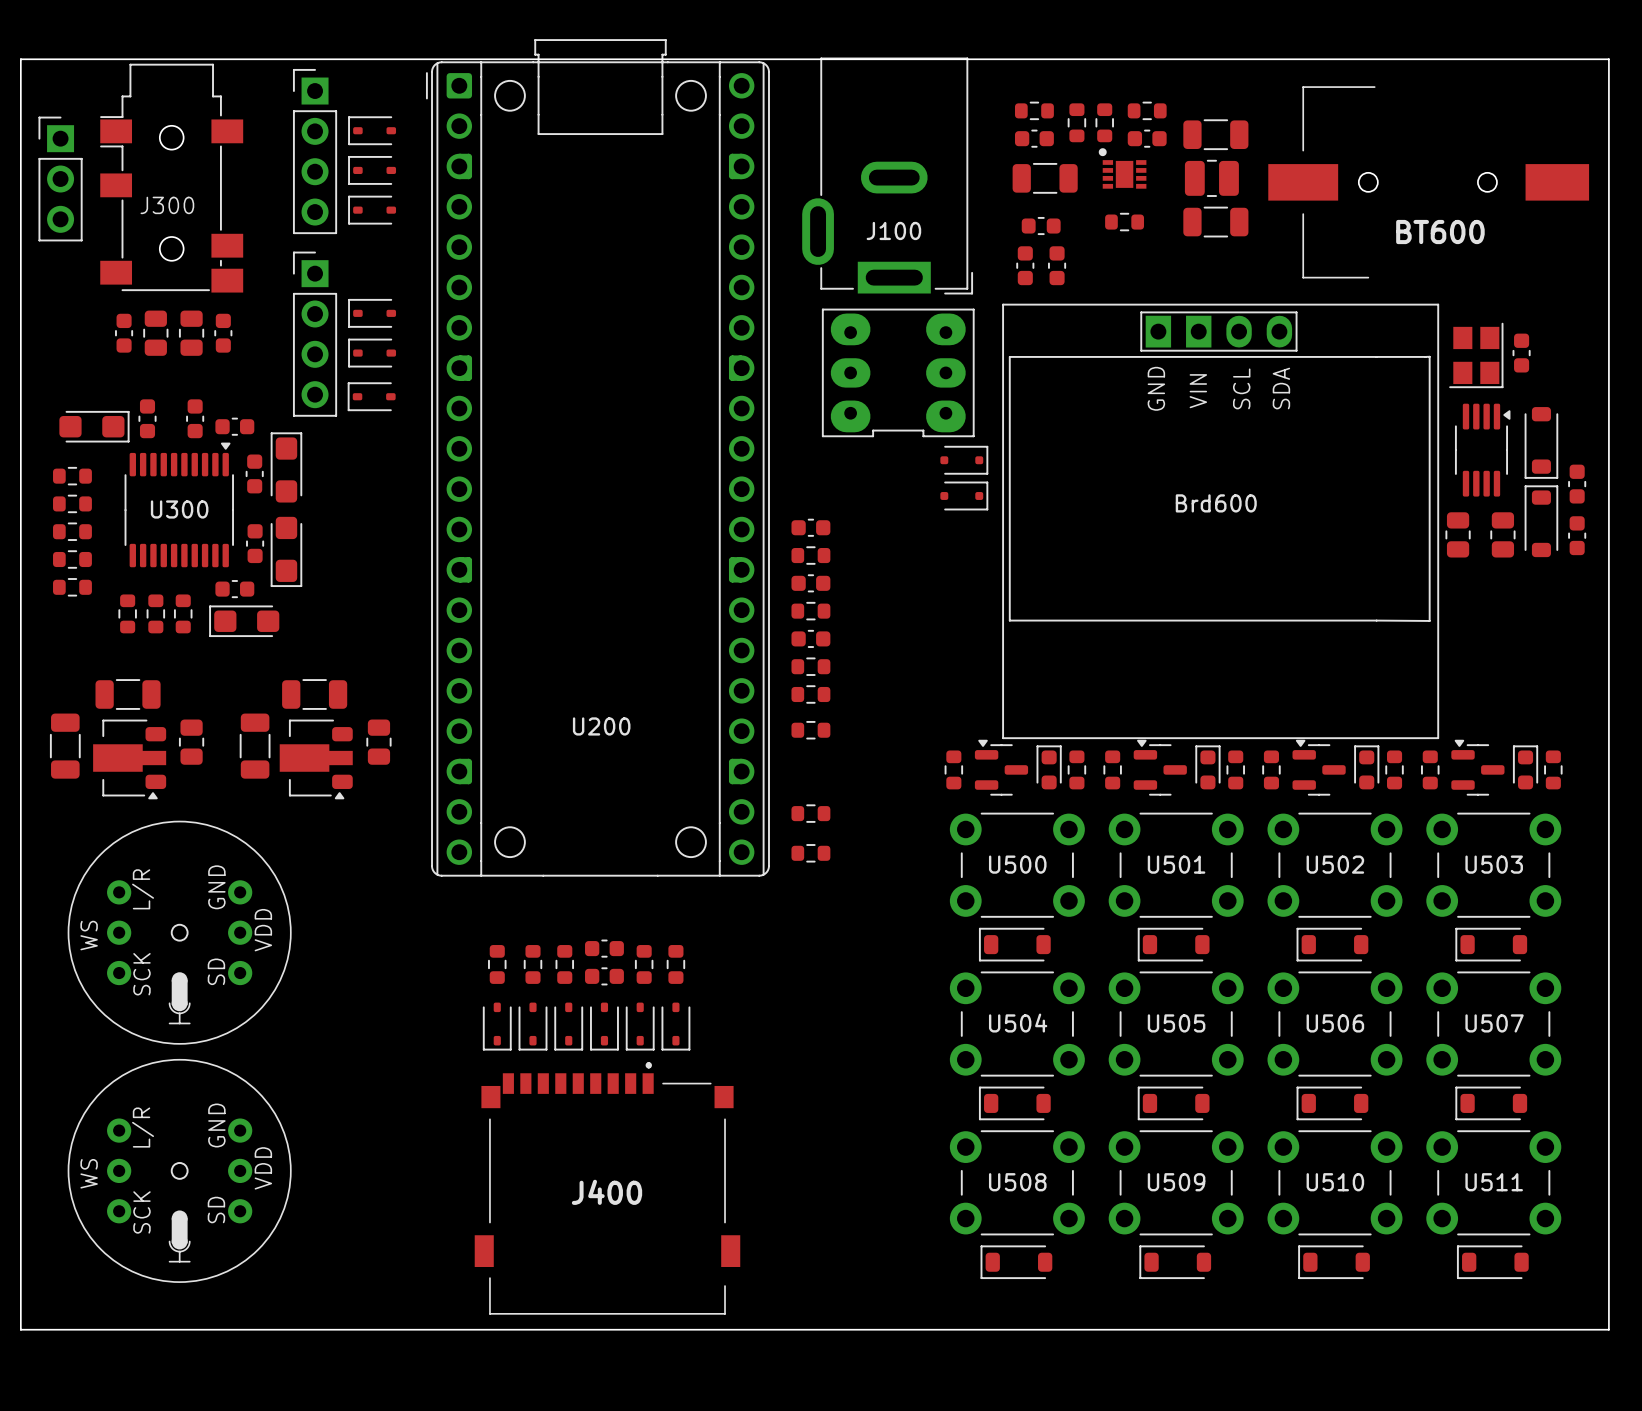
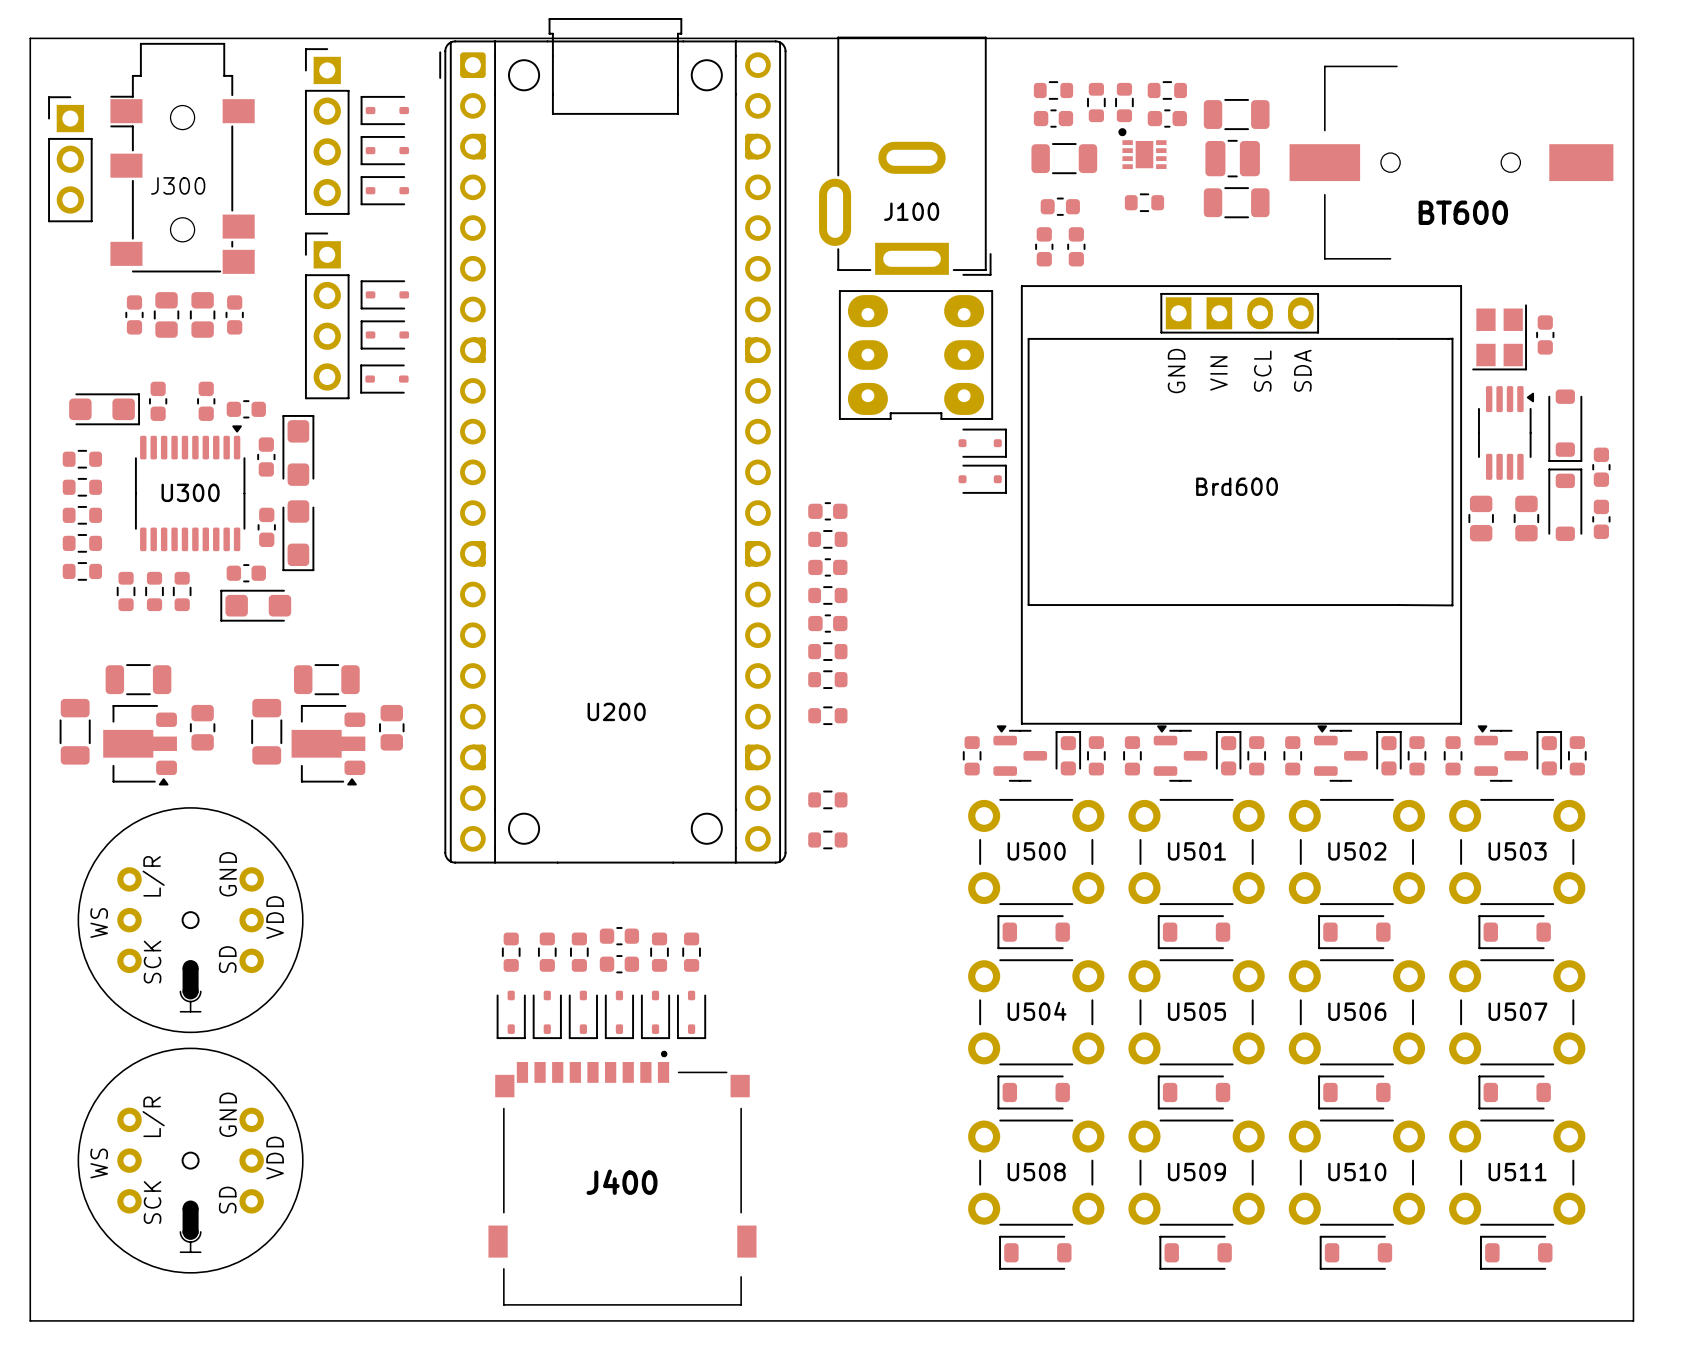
part: none -> (126, 591)
part: none -> (154, 591)
part: none -> (182, 591)
part: (127, 613) -> none
part: (155, 613) -> none
part: (183, 613) -> none

